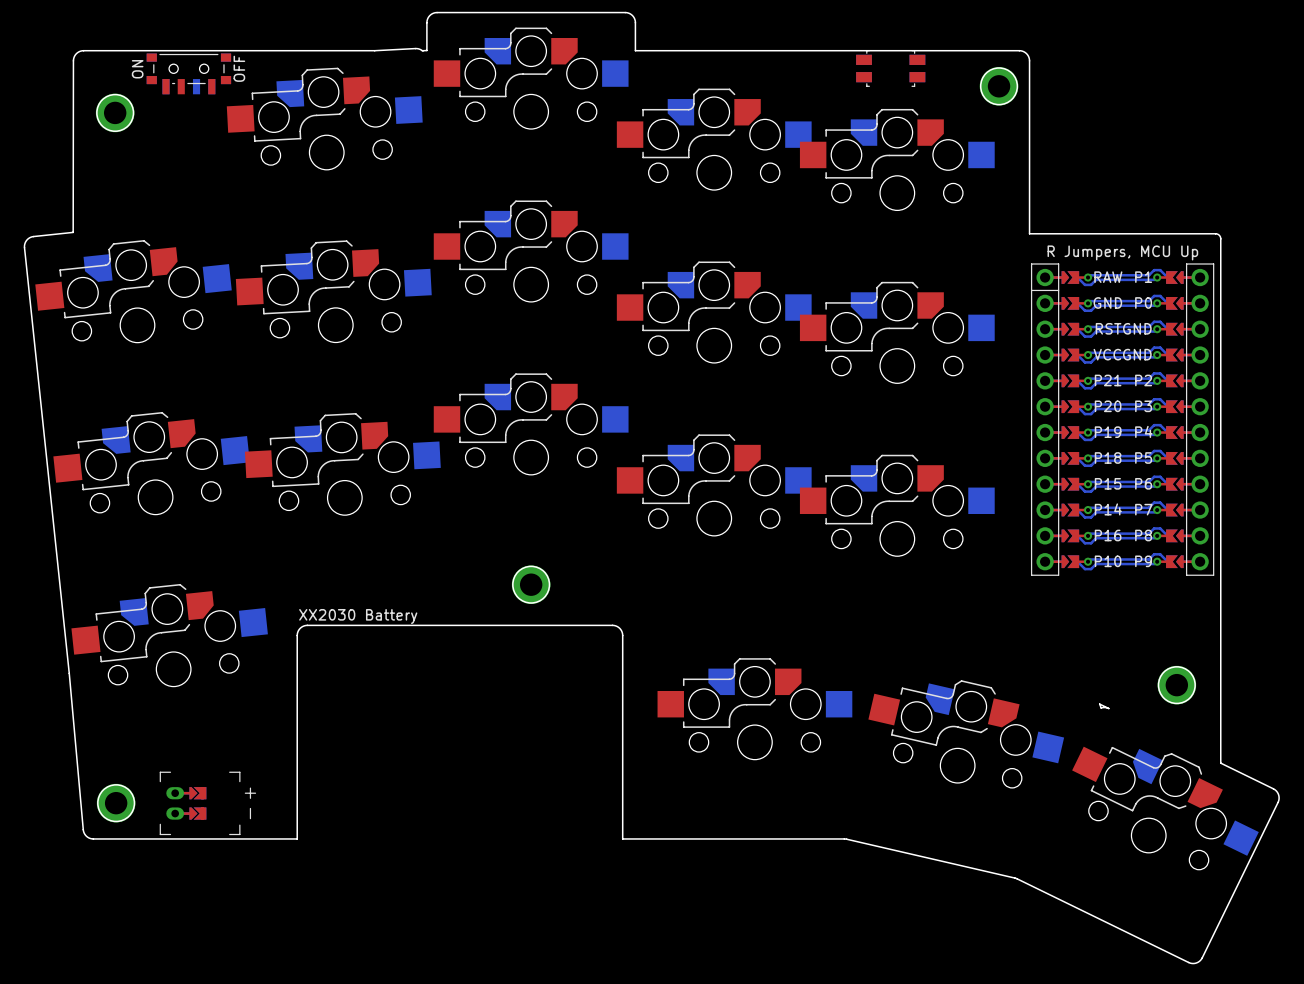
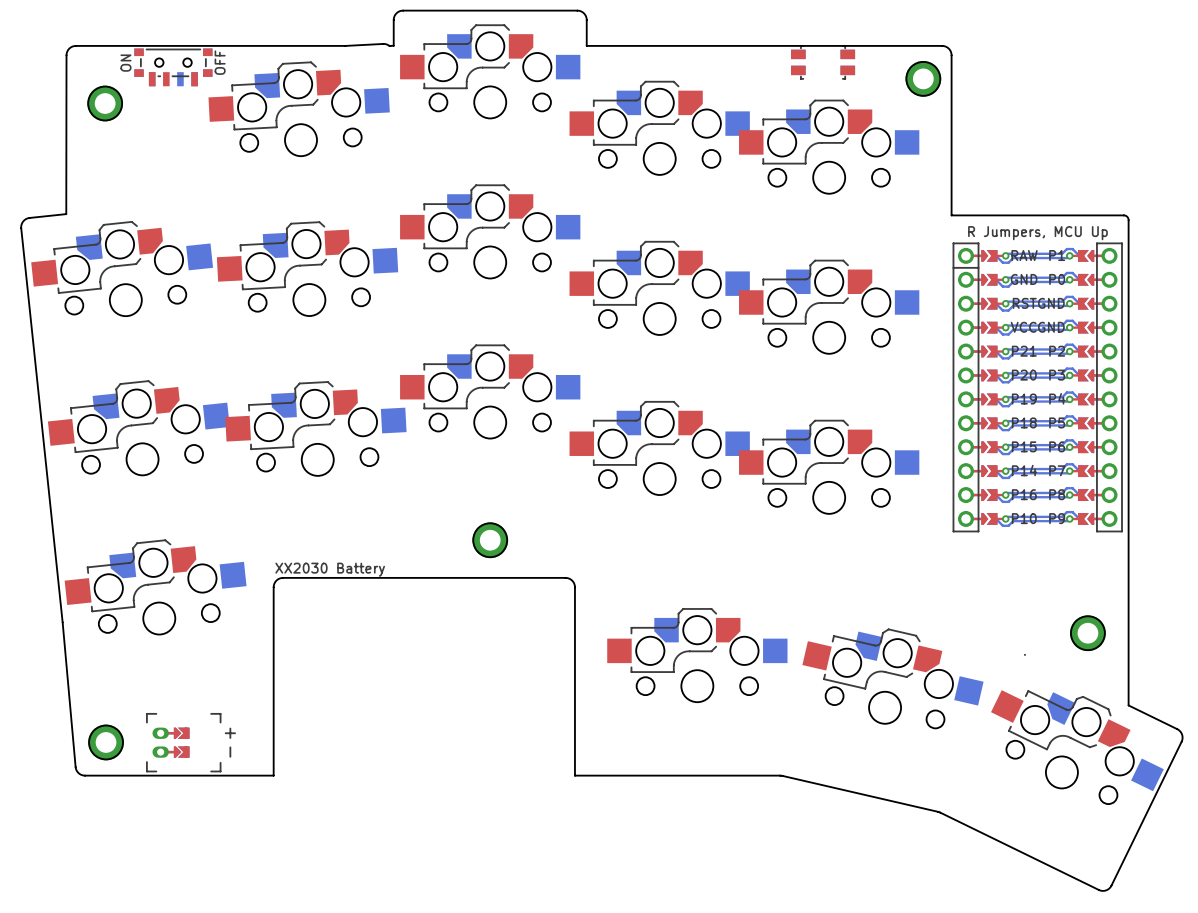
board edge: (1099, 704) (1108, 708) (1101, 708) (1099, 704) -> none

